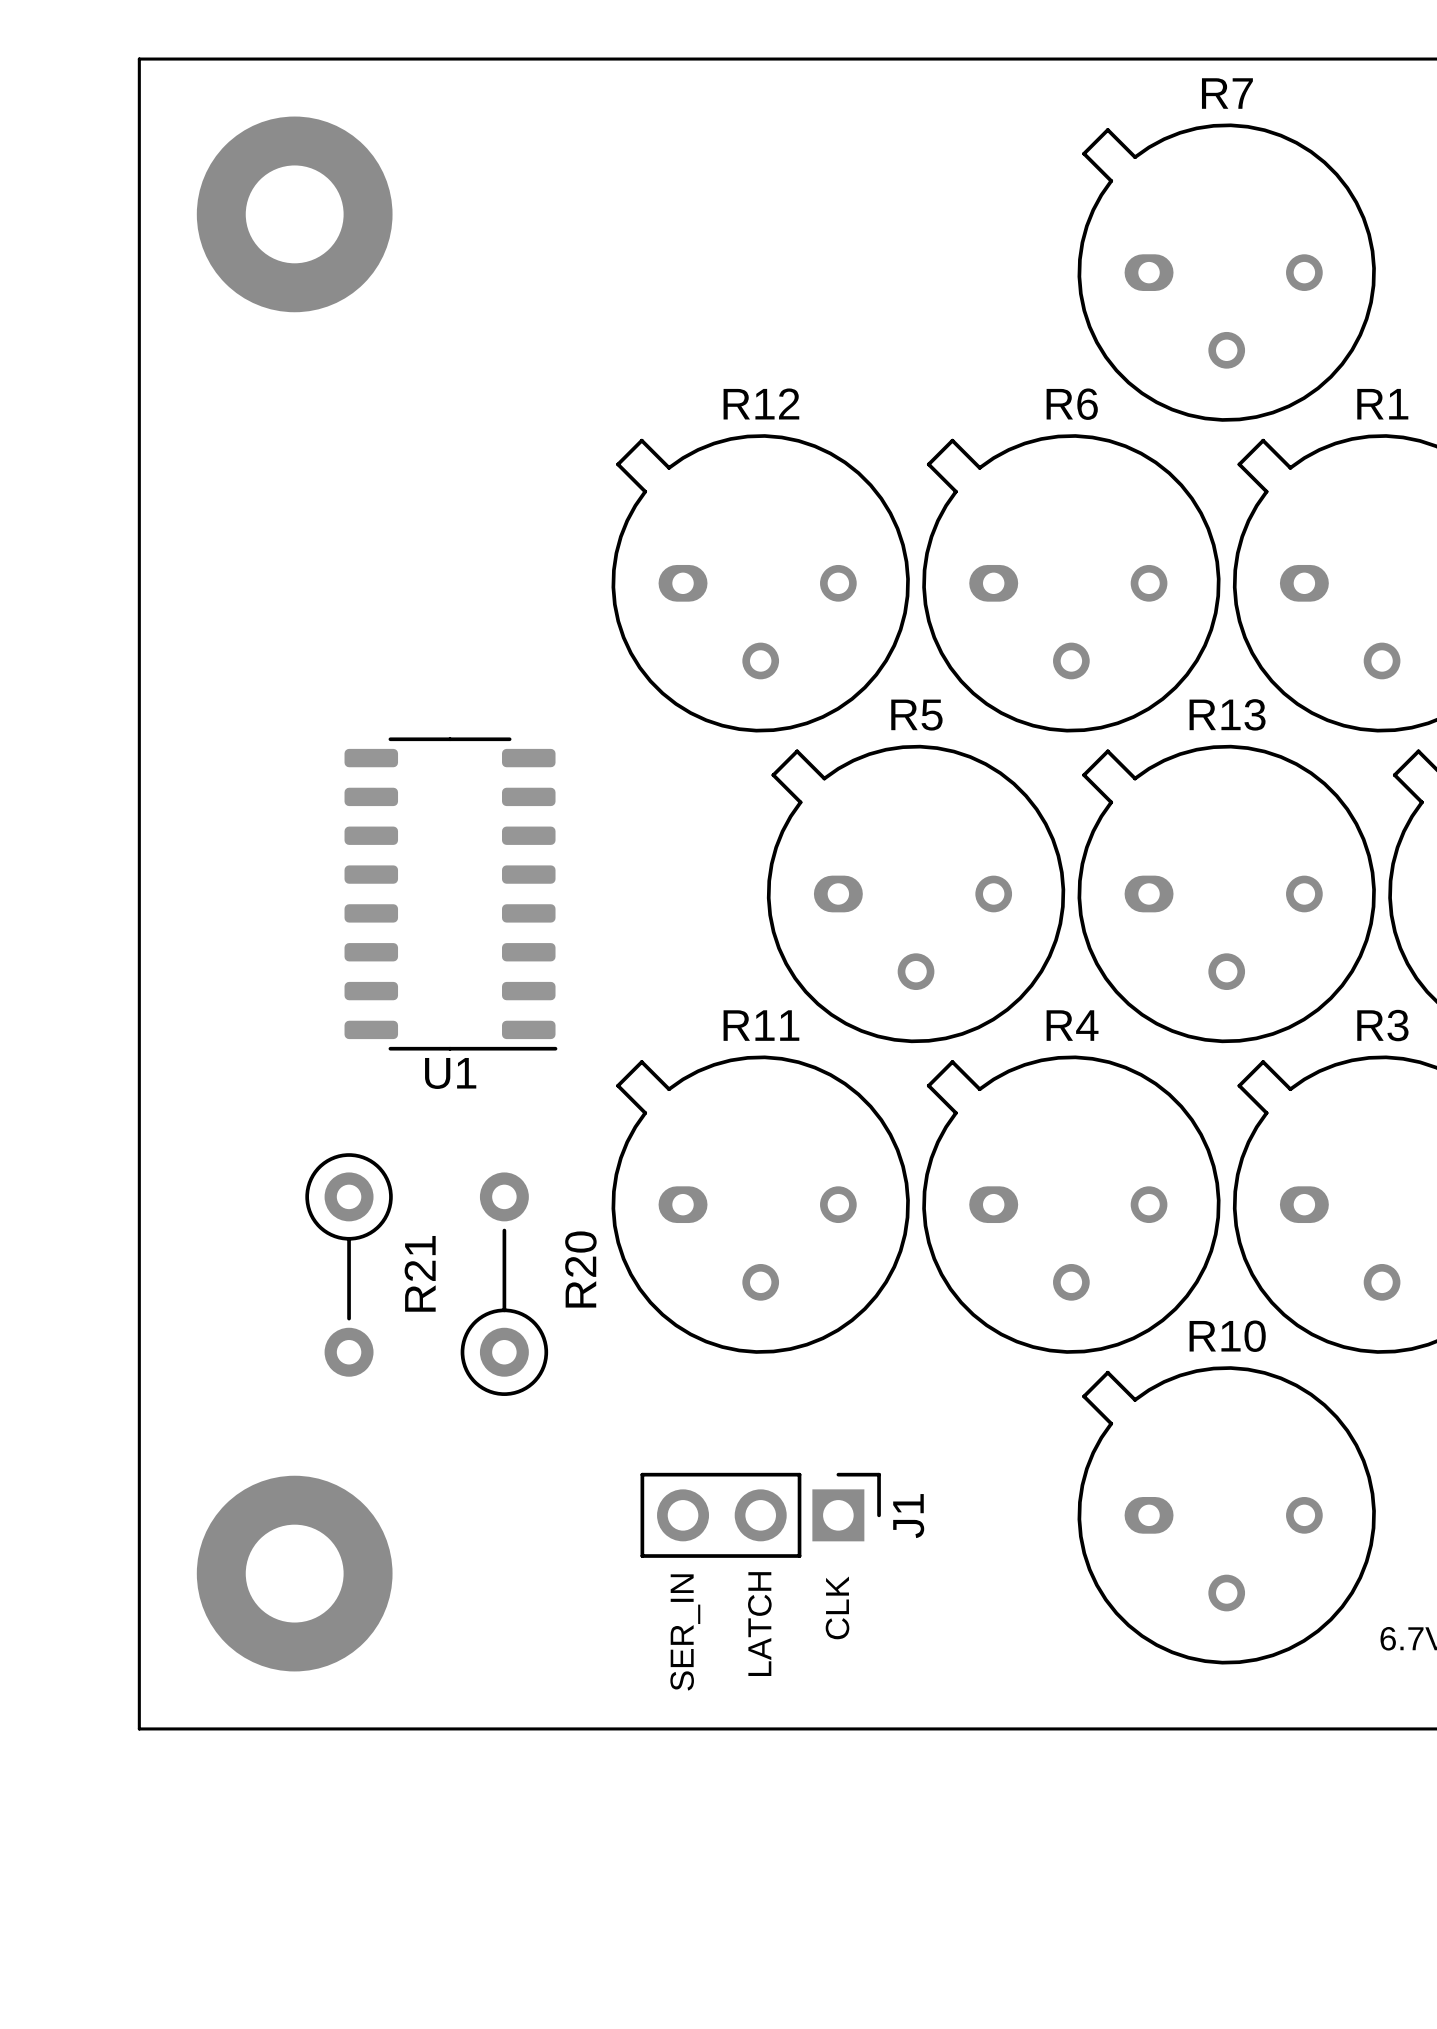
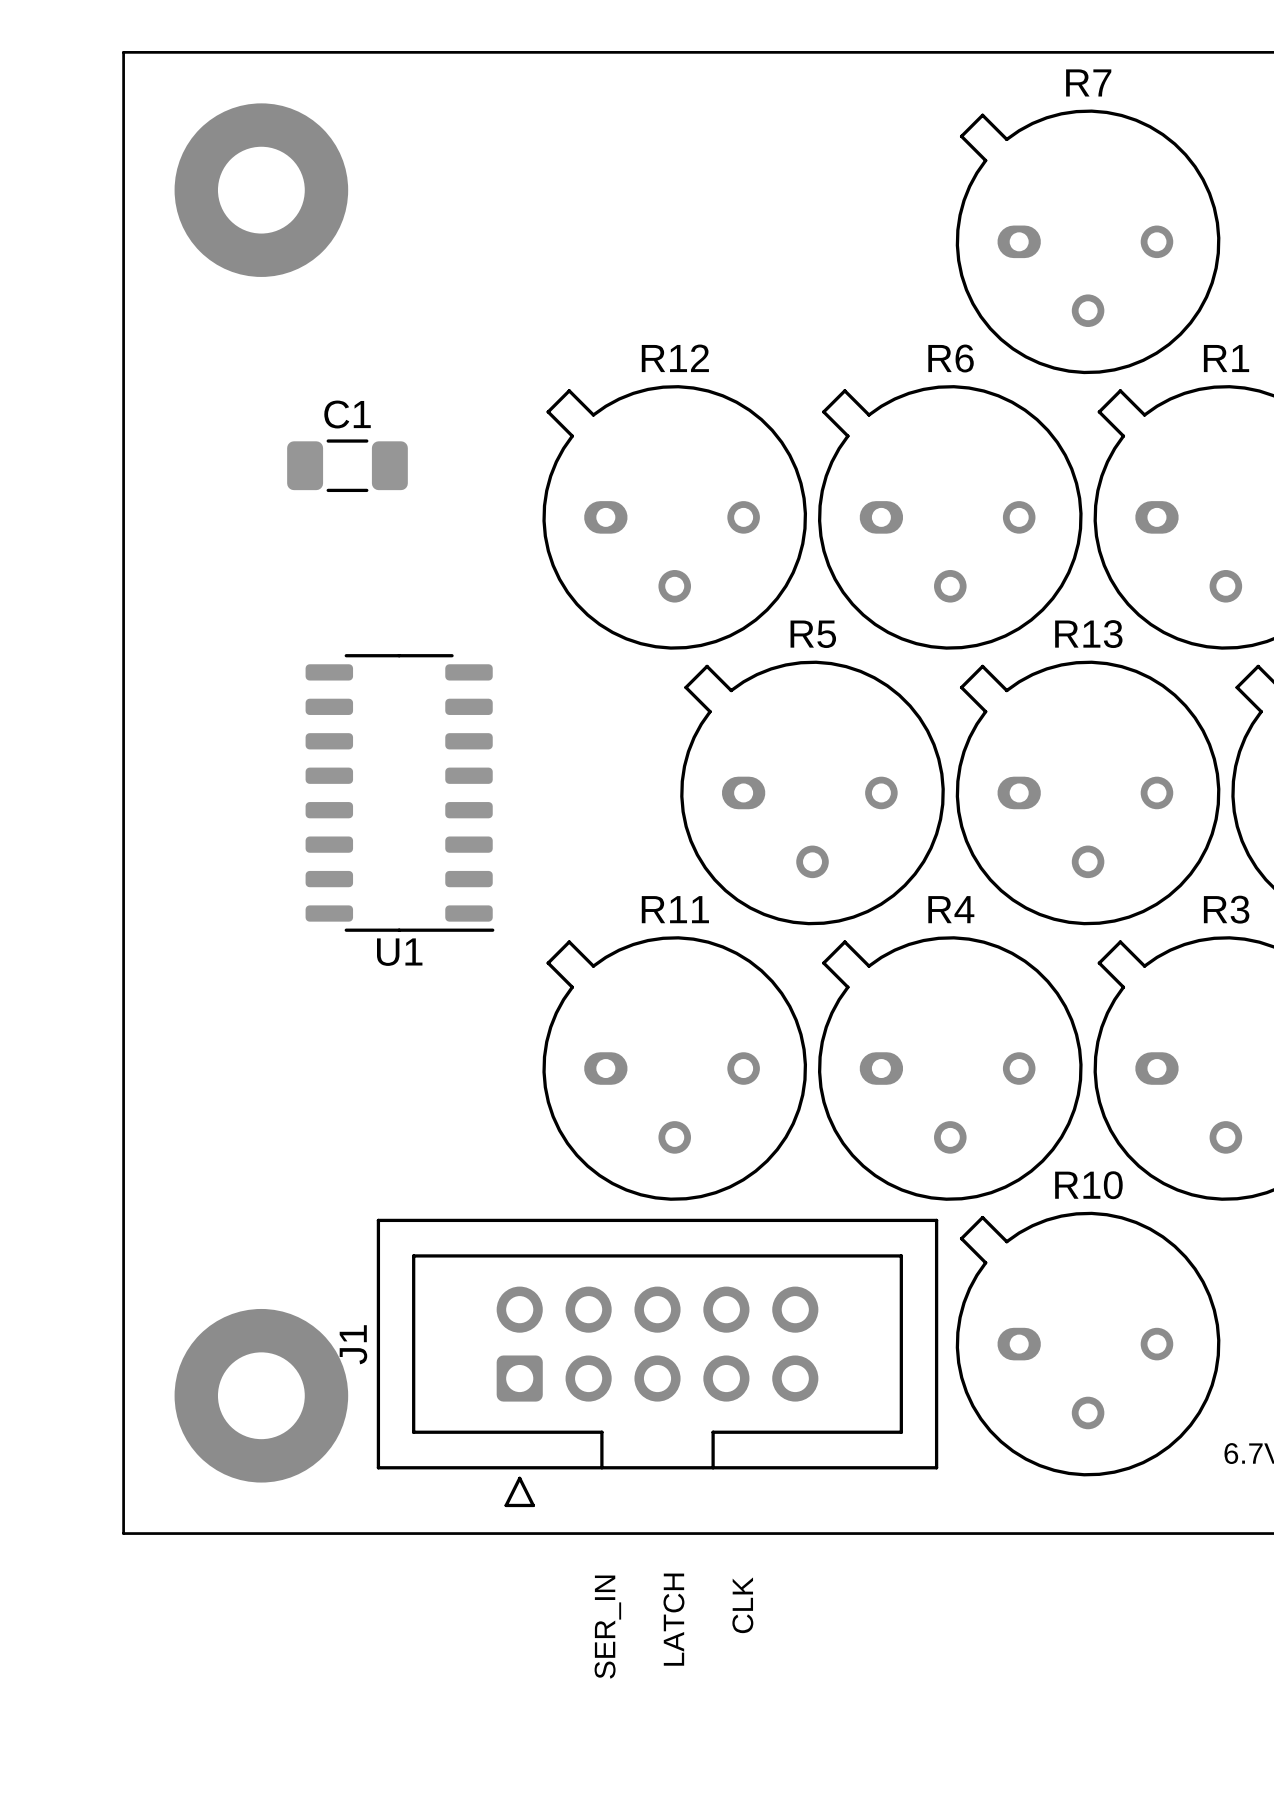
C1: none -> (347, 465)
R21: (349, 1264) -> none
R20: (504, 1284) -> none
J1 footprint: [640, 1472, 881, 1558] -> [376, 1218, 939, 1508]
J1 name position: J1 (908, 1516) -> J1 (353, 1344)
text position: CLK (837, 1607) -> CLK (742, 1605)
text position: LATCH (759, 1624) -> LATCH (673, 1619)
text position: SER_IN (685, 1632) -> SER_IN (607, 1627)

